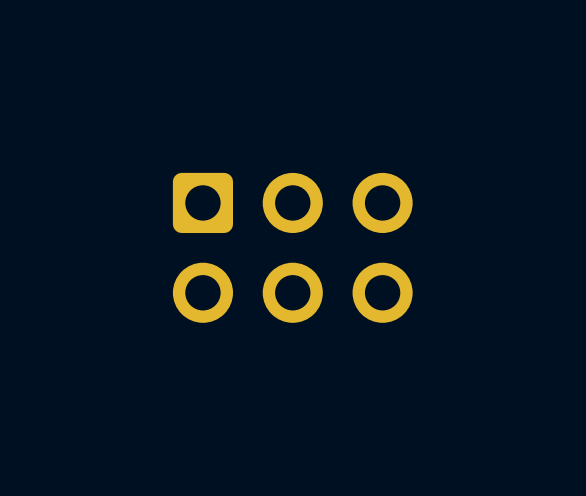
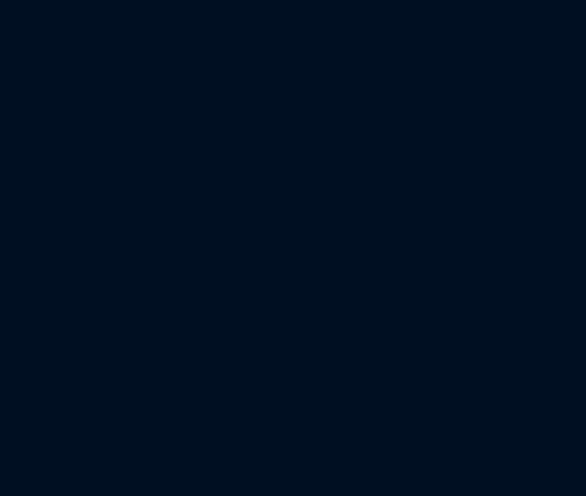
part: (292, 247) -> none

